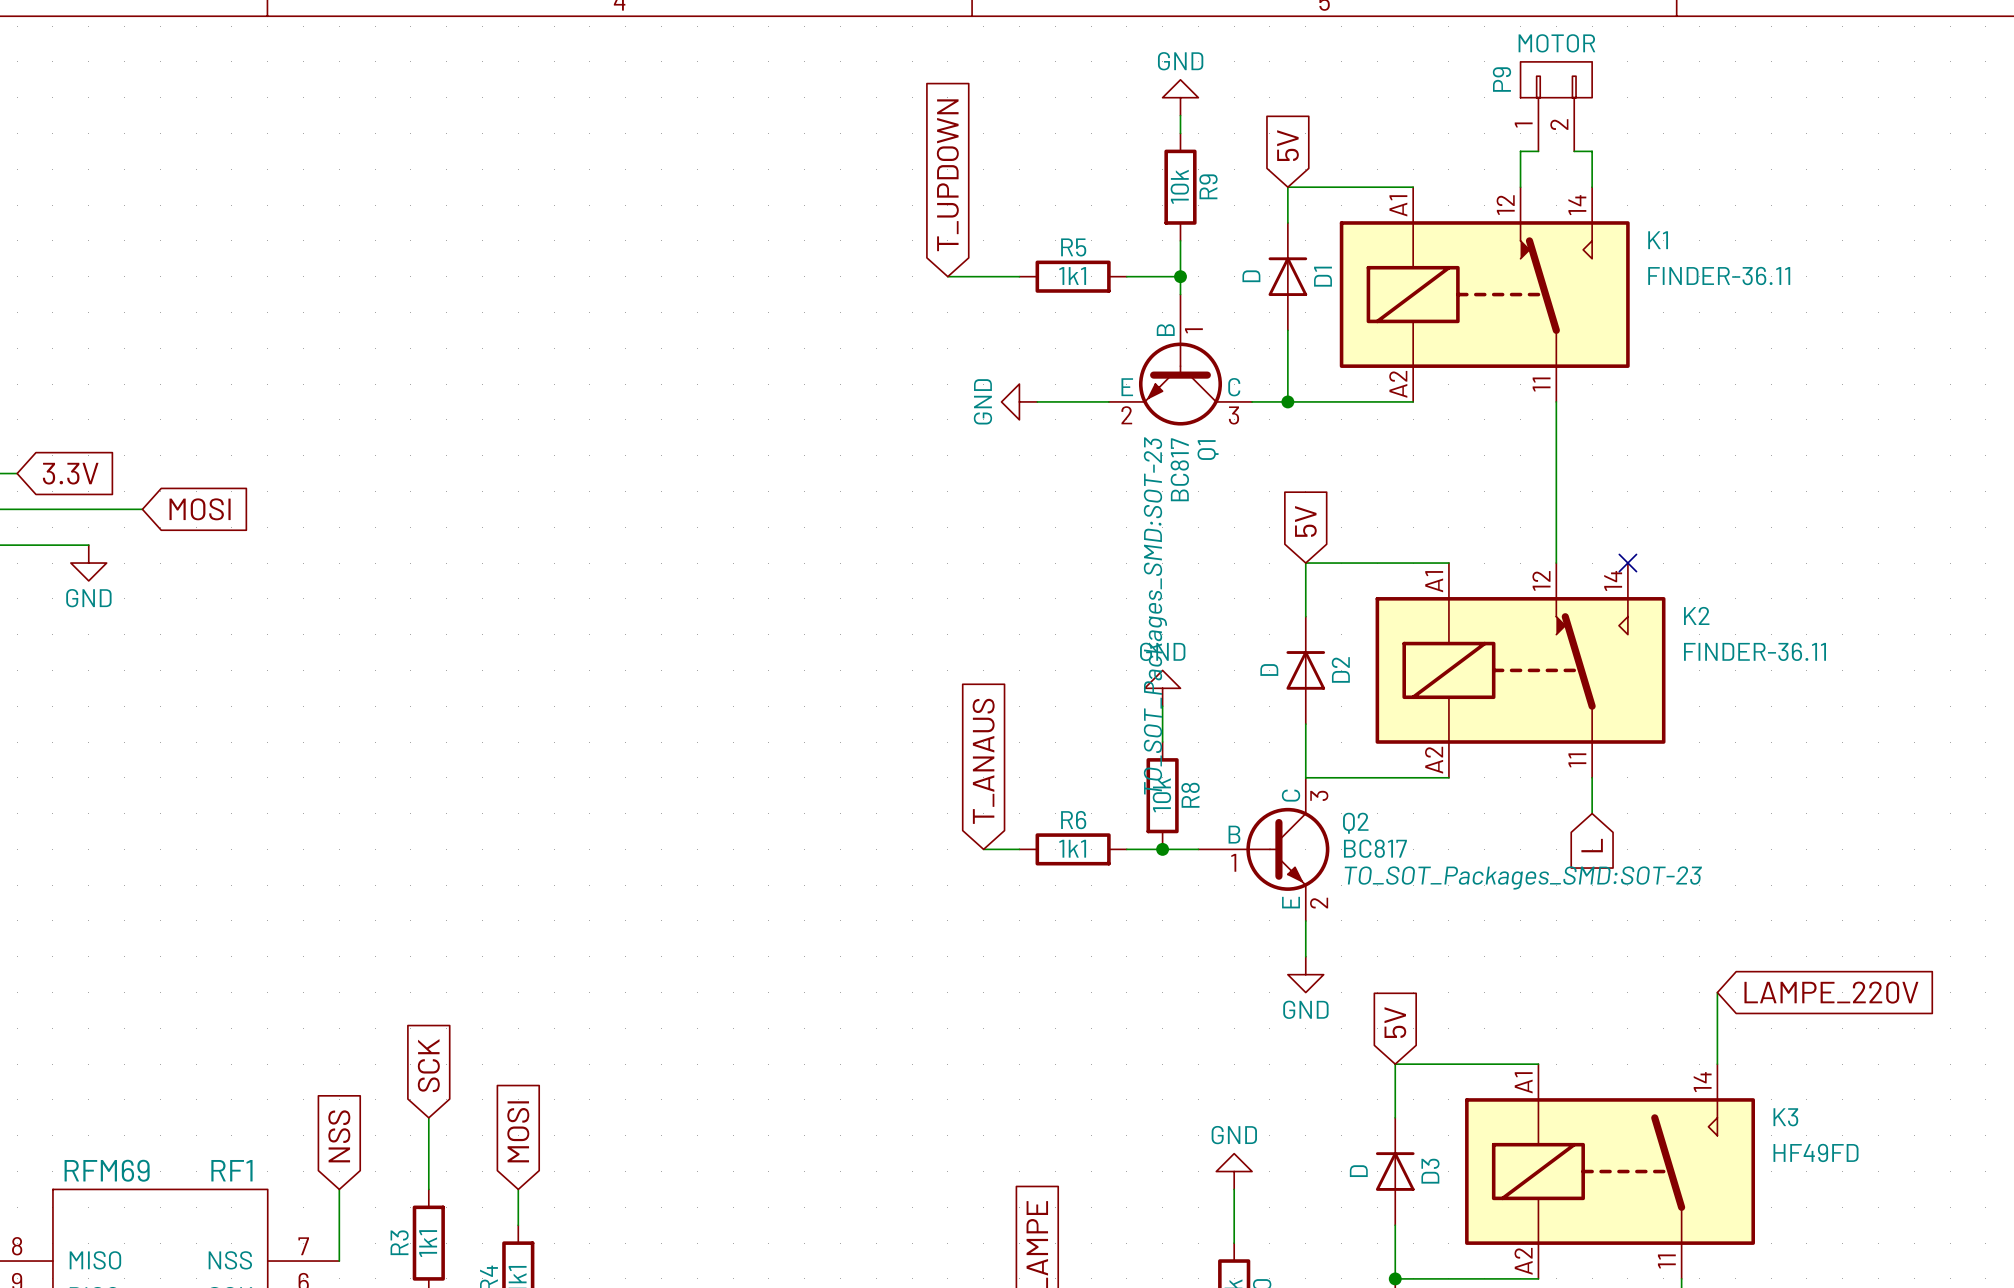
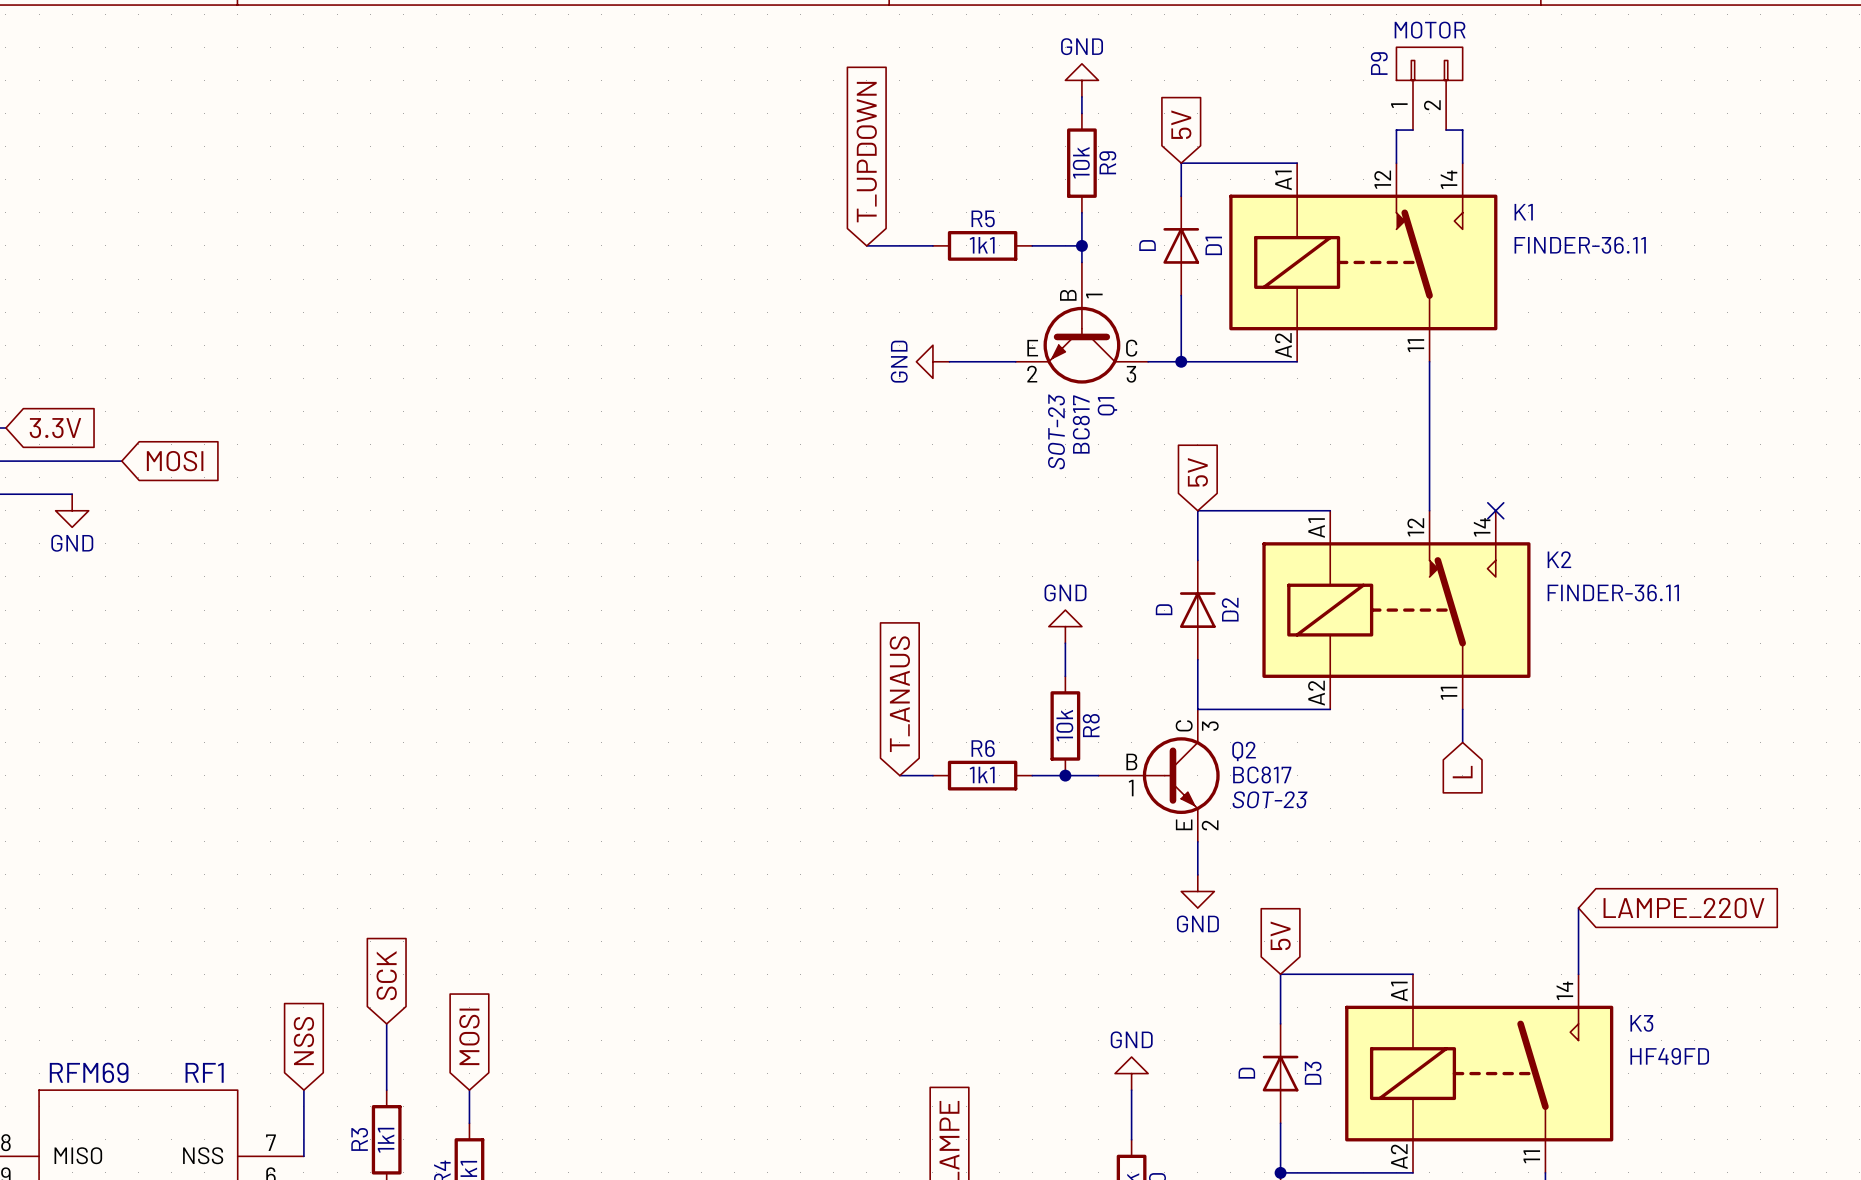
Q1 text: TO_SOT_Packages_SMD:SOT-23 (1155, 615) -> SOT-23 (1056, 431)
Q2 text: TO_SOT_Packages_SMD:SOT-23 (1523, 878) -> SOT-23 (1269, 799)

